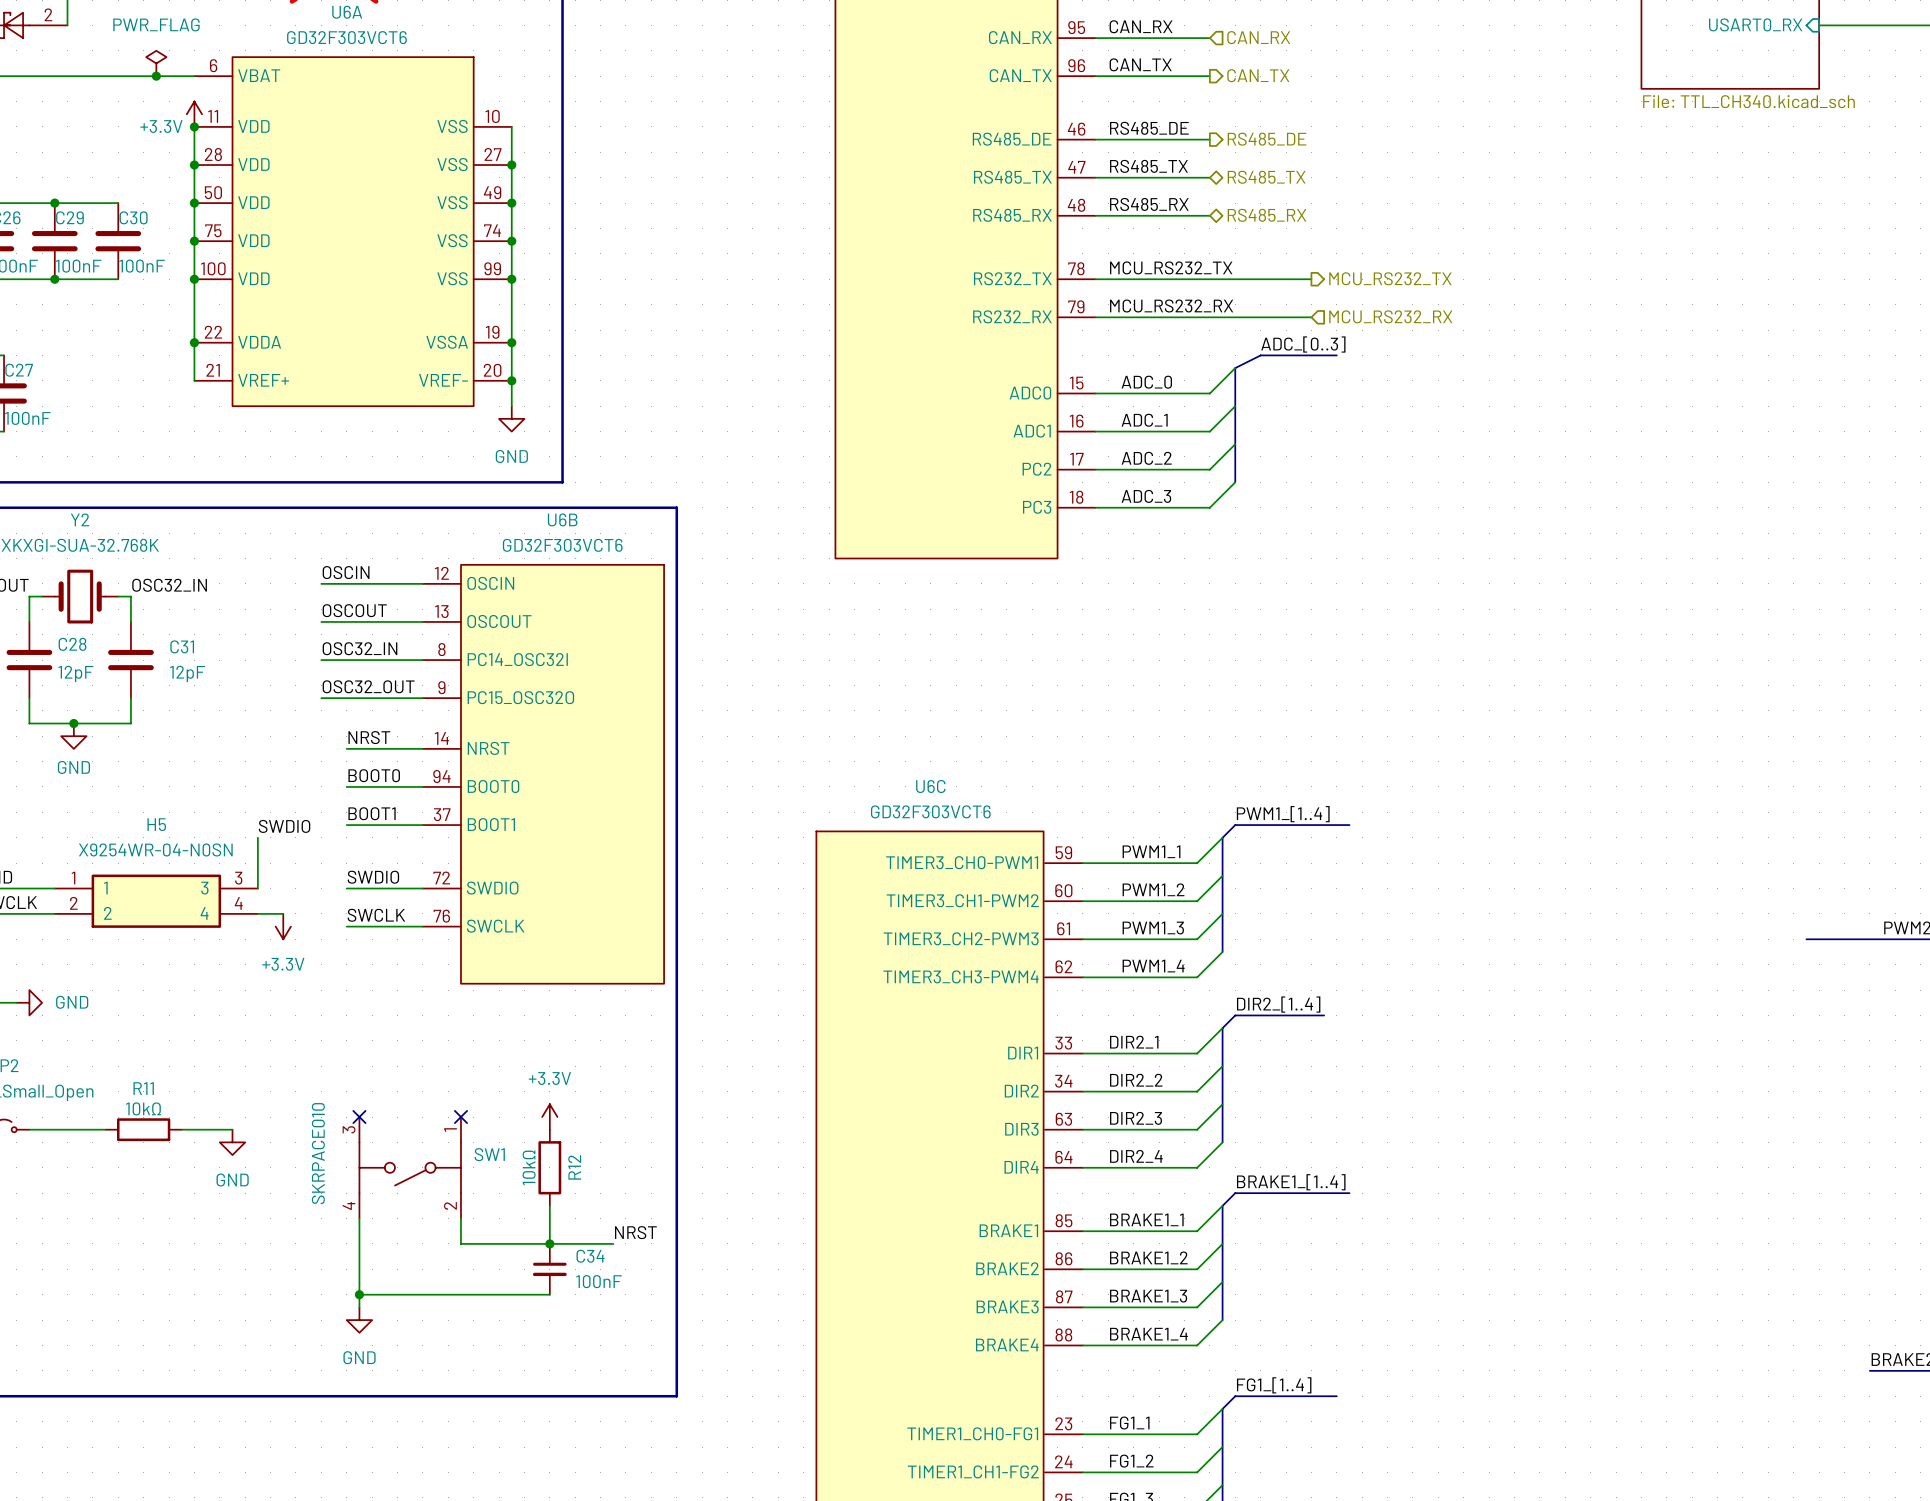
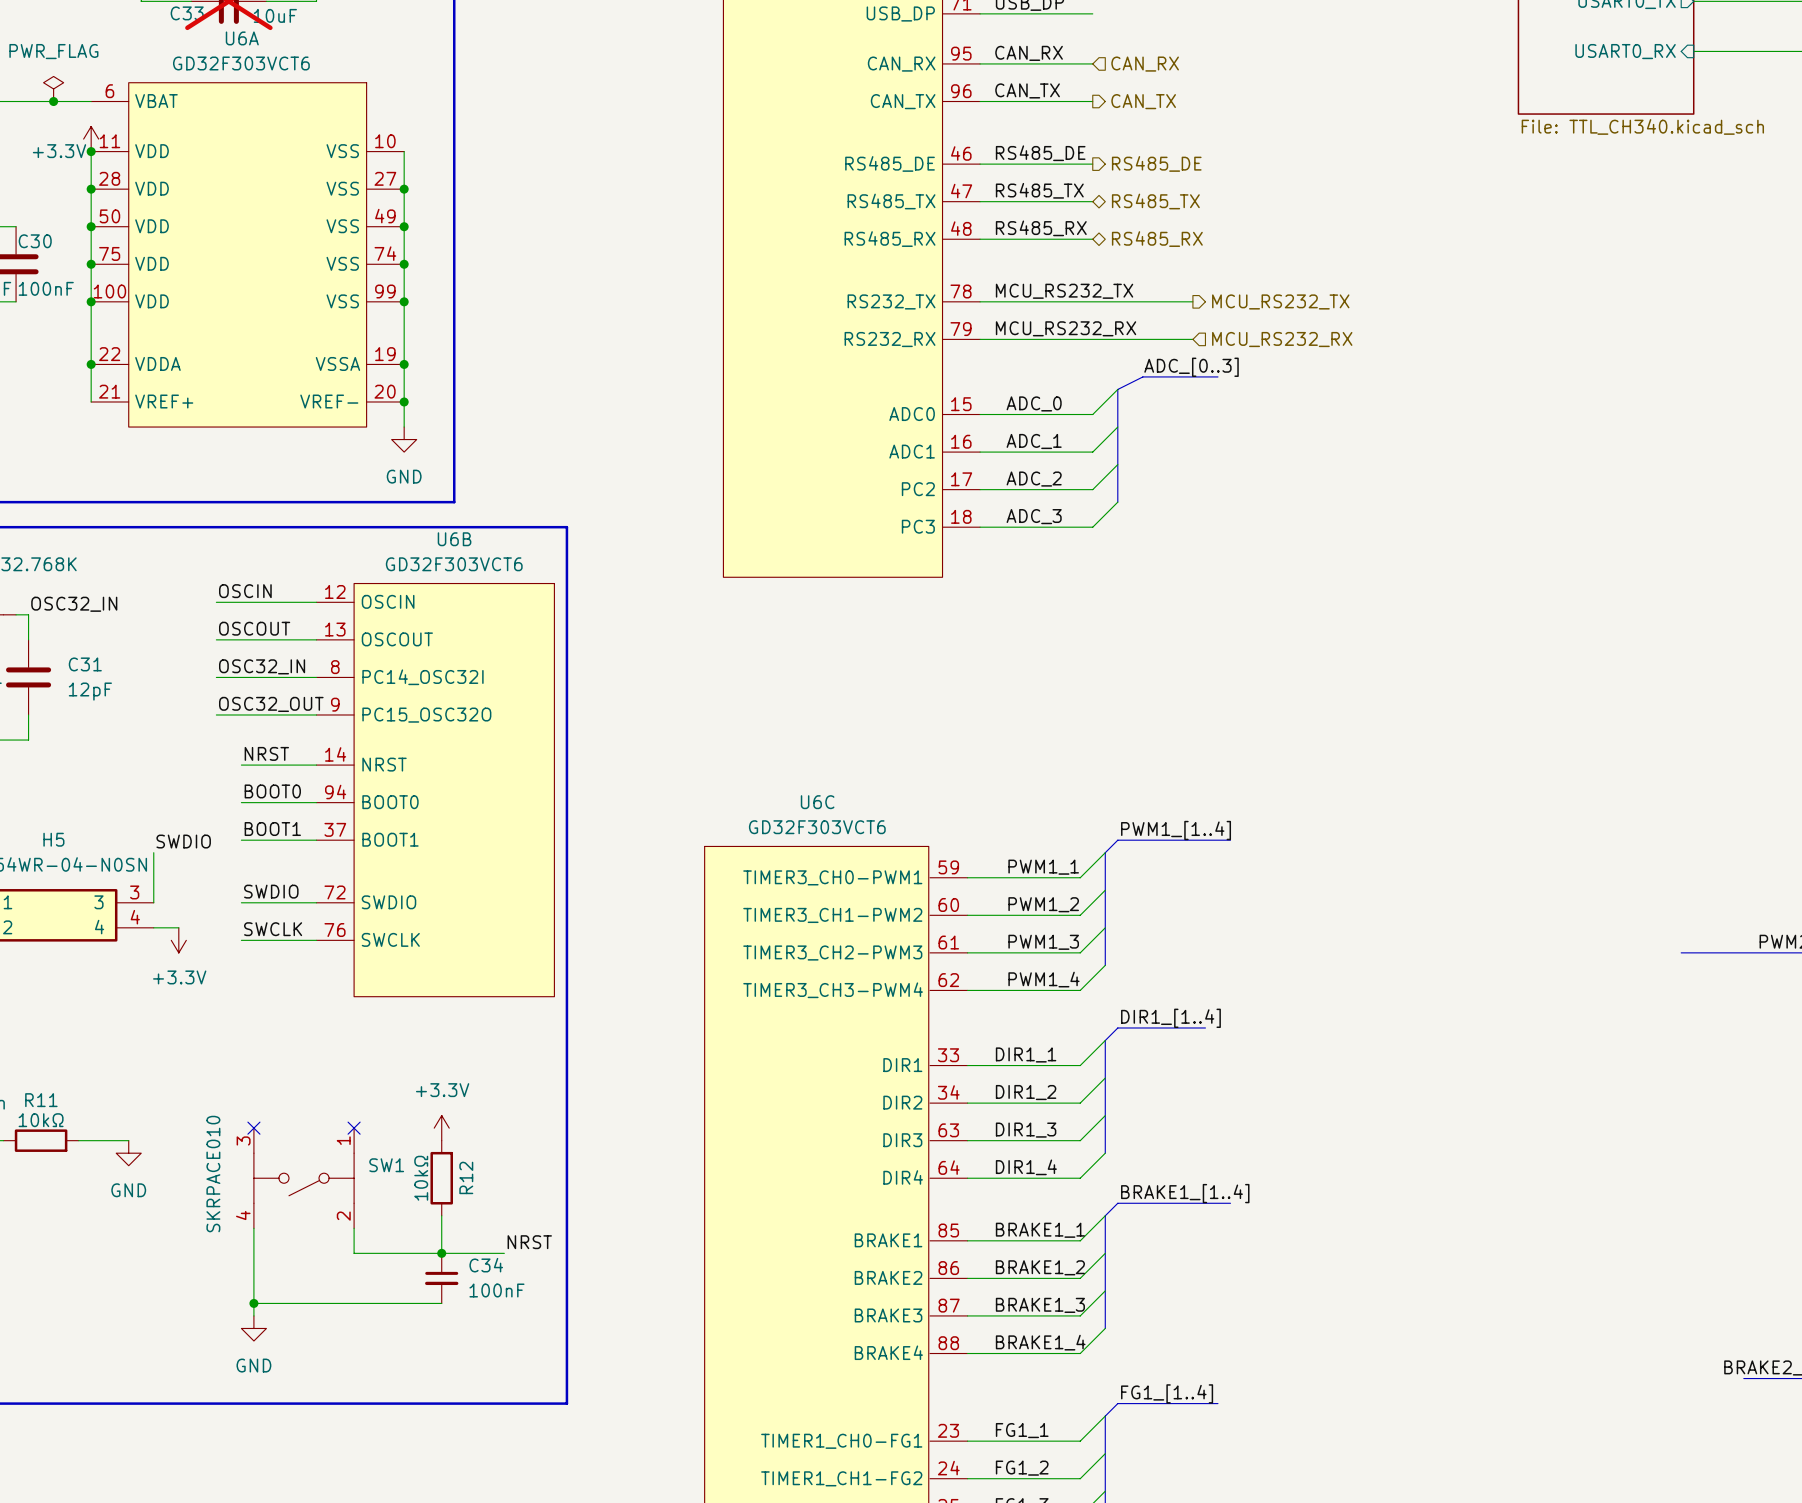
label: DIR2_[1..4] (1278, 1004) -> DIR1_[1..4] (1170, 1018)
label: DIR2_1 (1134, 1042) -> DIR1_1 (1026, 1054)
label: DIR2_2 (1136, 1080) -> DIR1_2 (1026, 1092)
label: DIR2_3 (1136, 1118) -> DIR1_3 (1026, 1130)
label: DIR2_4 (1136, 1156) -> DIR1_4 (1026, 1167)

